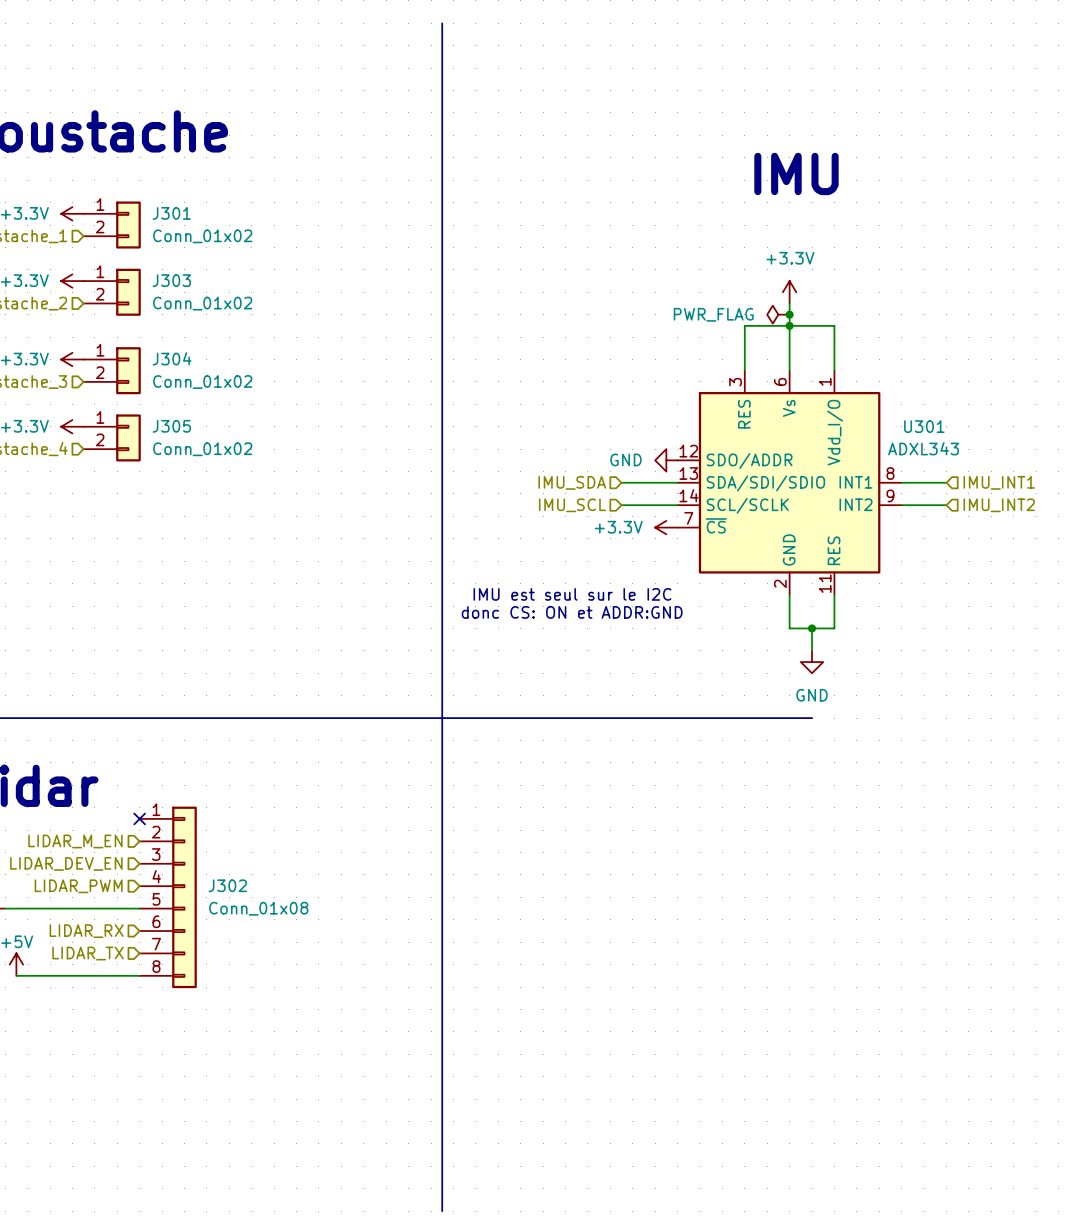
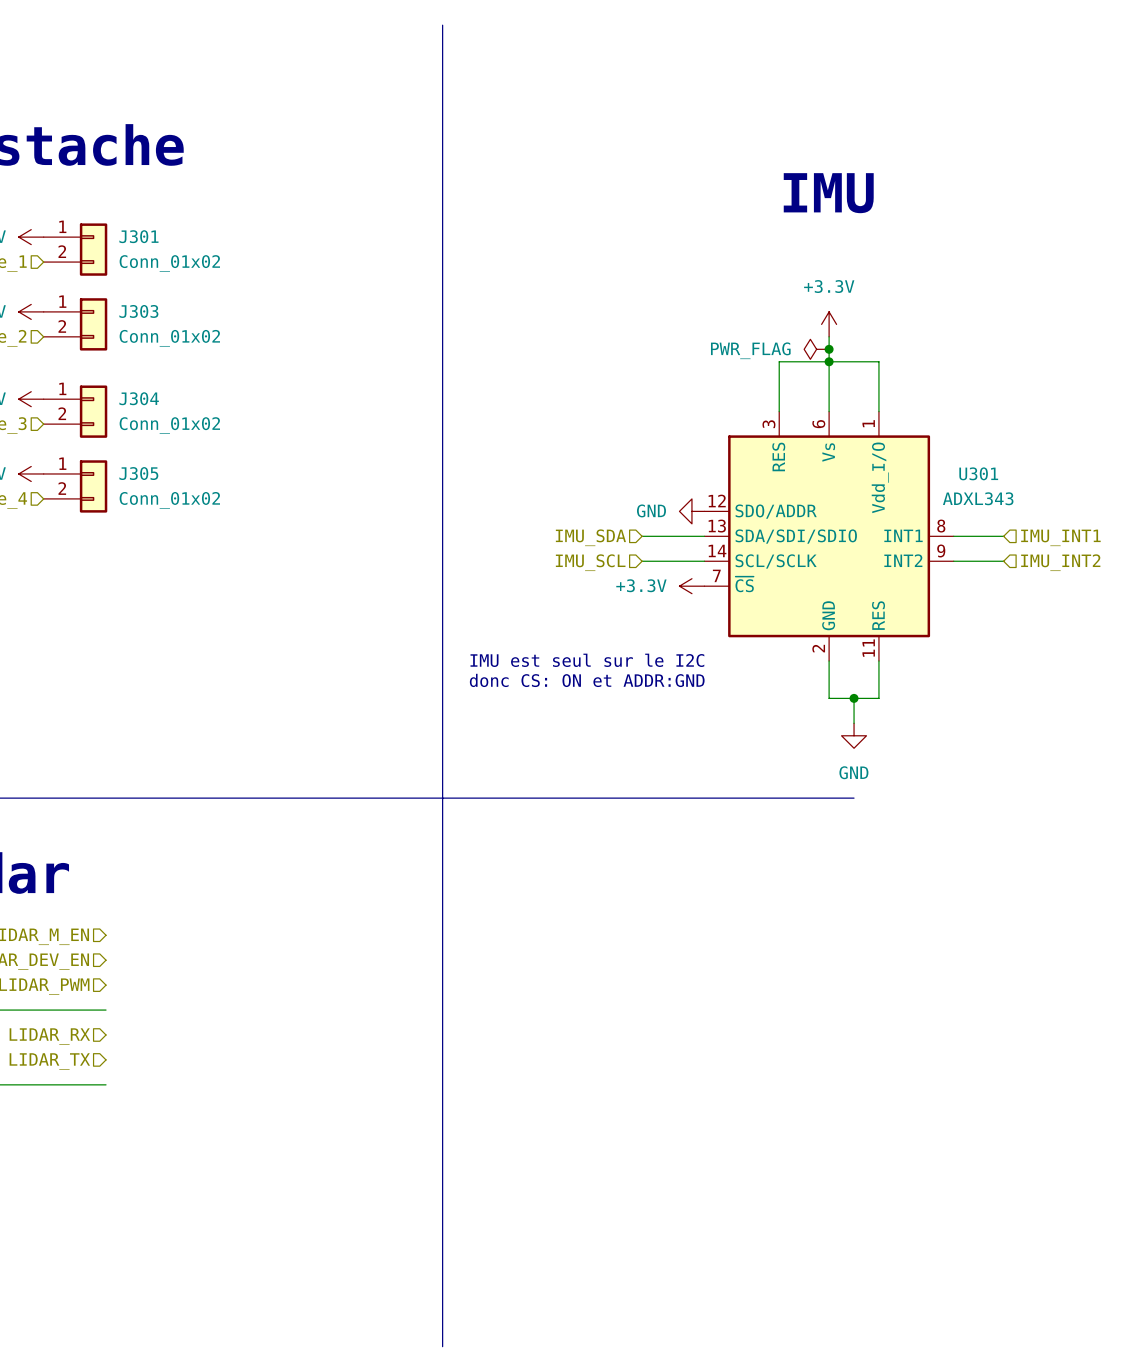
no-connect mark: (139, 818) -> none
J302: Conn_01x08 (168, 897) -> none

